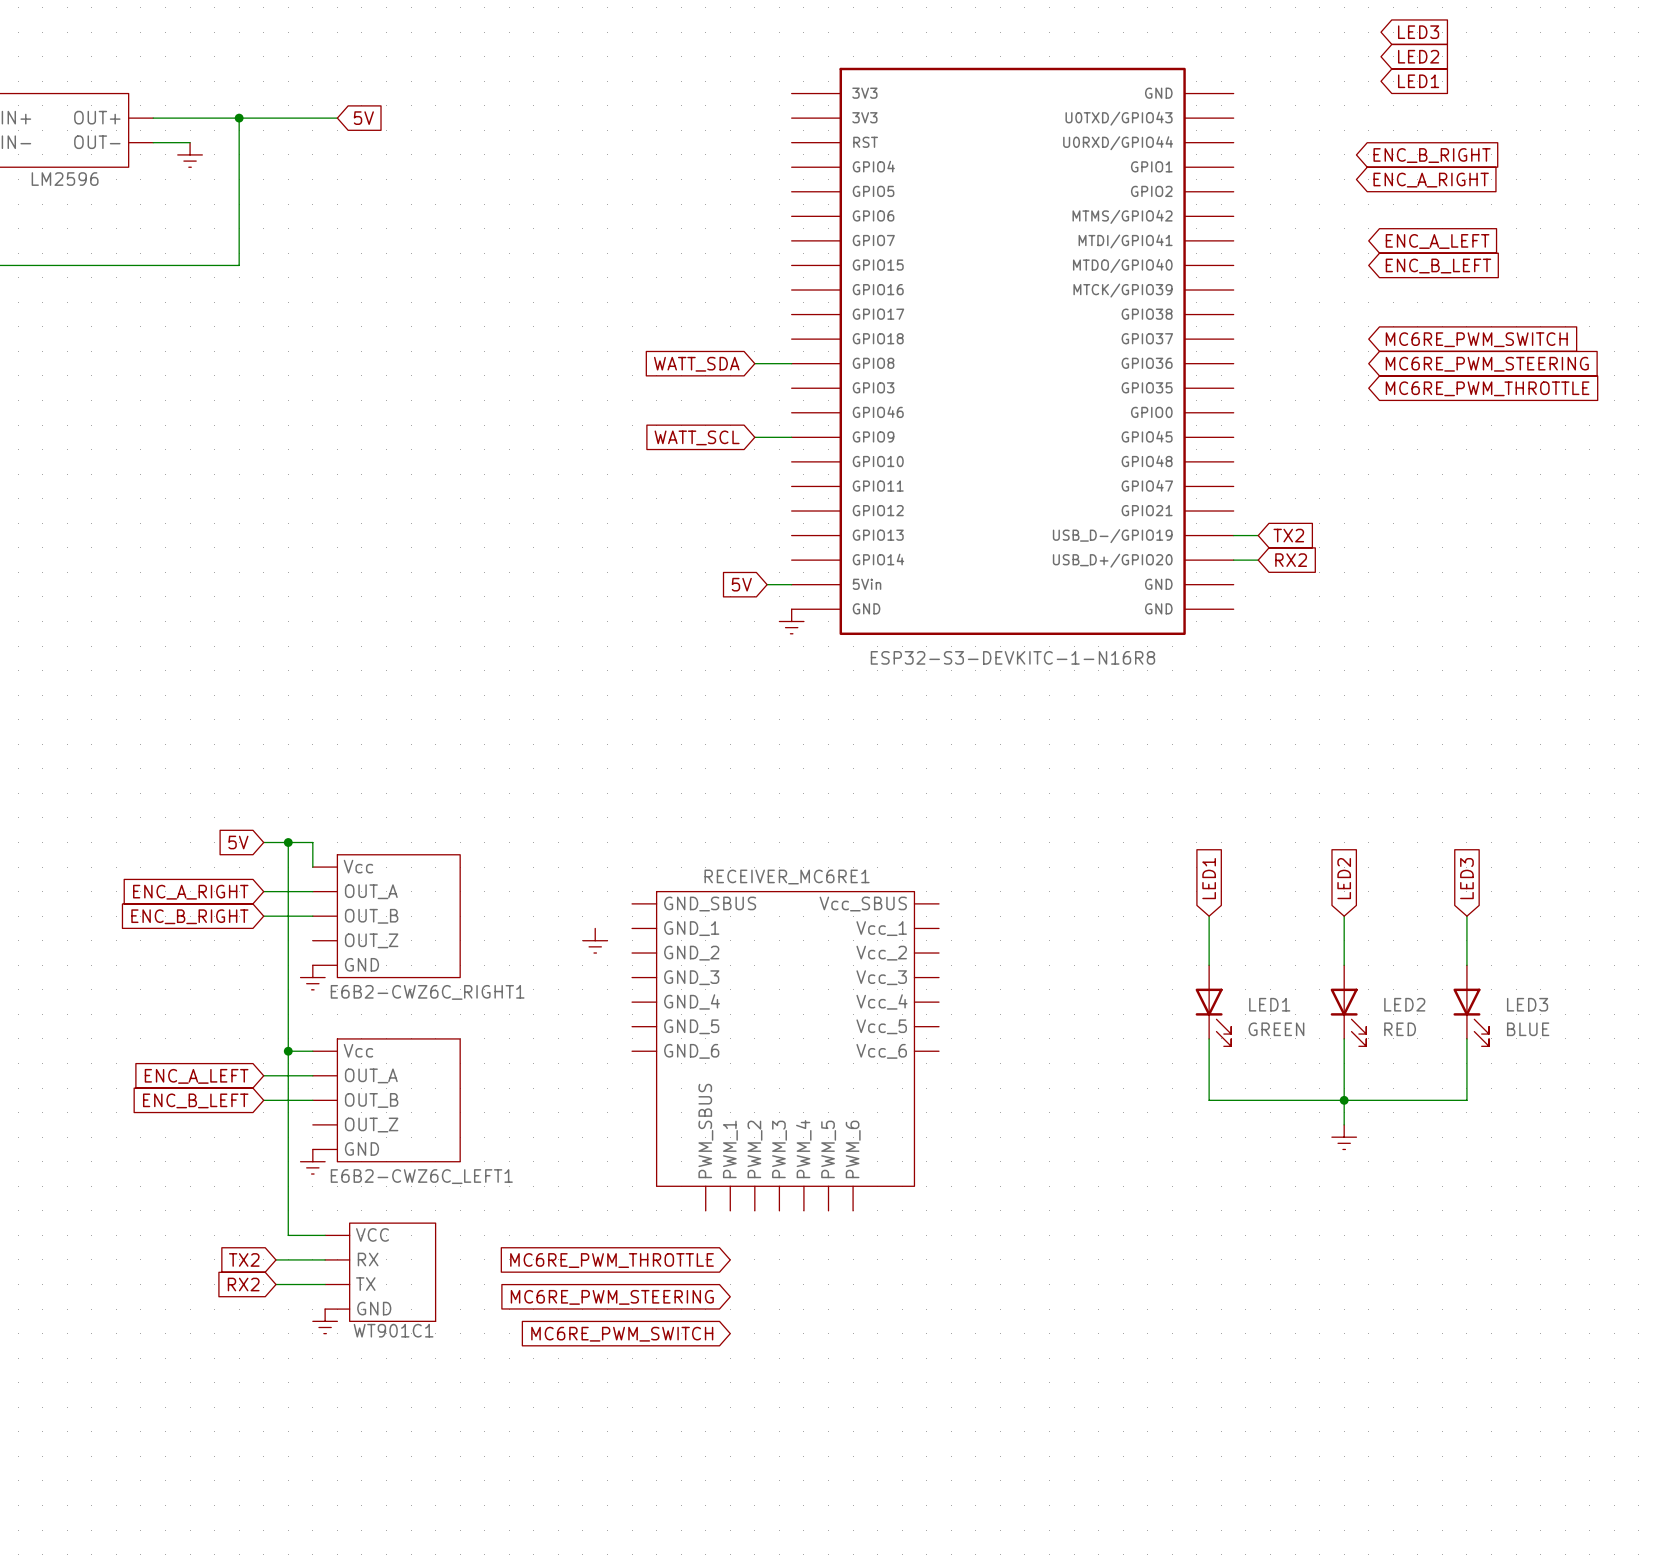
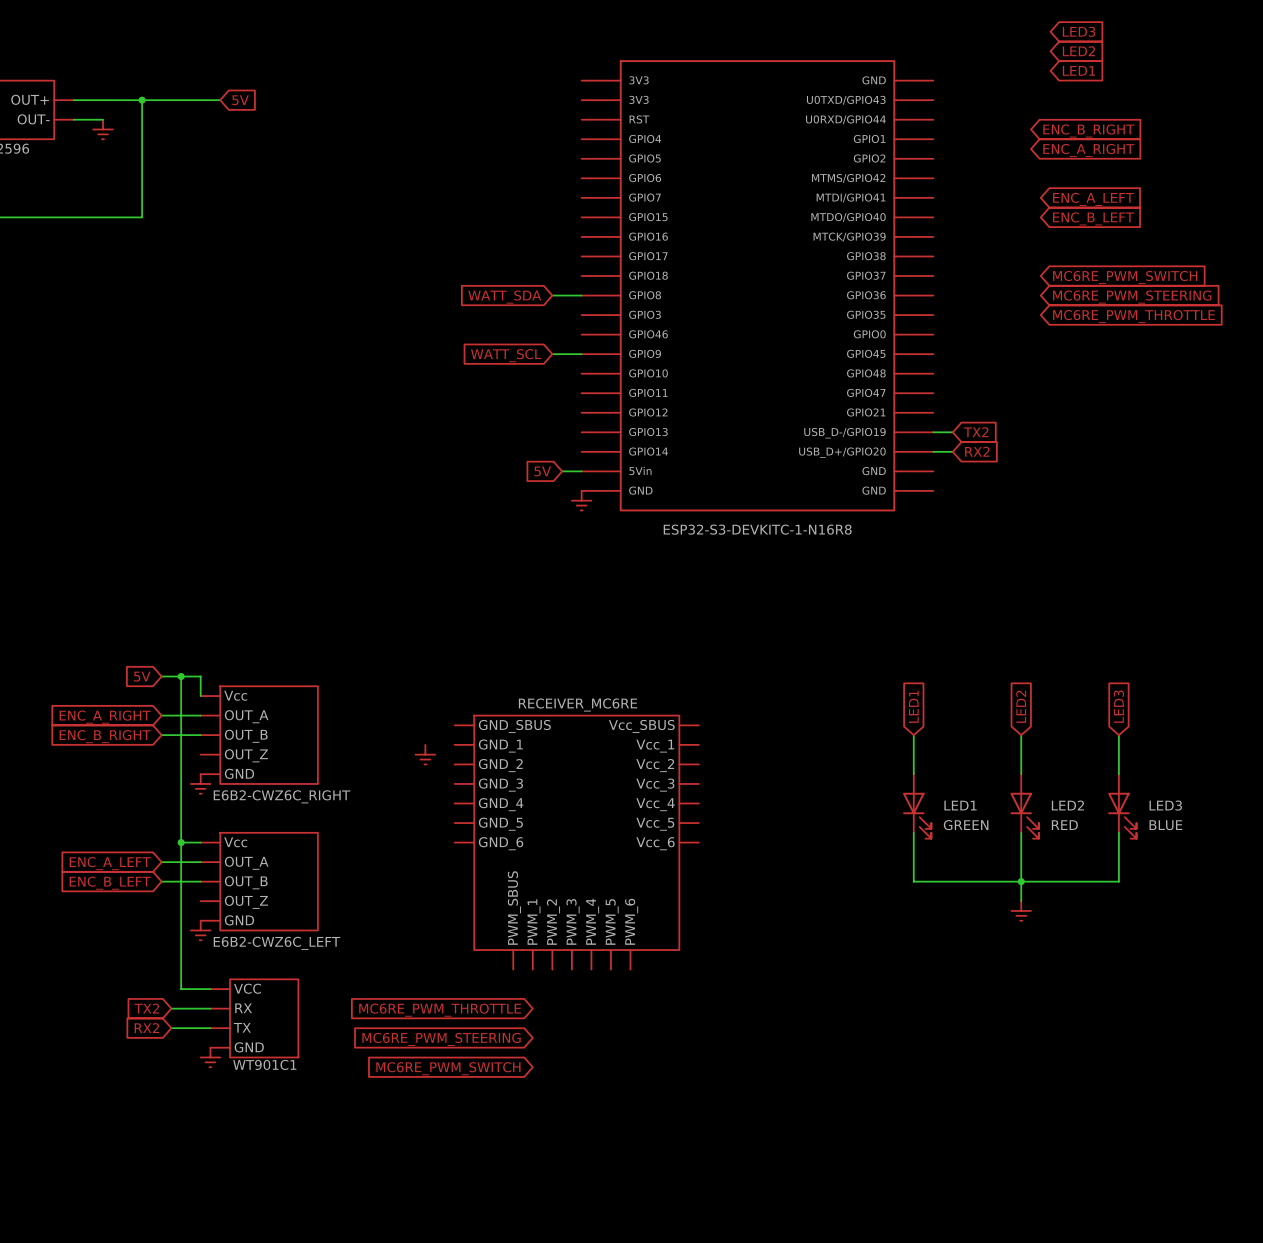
RECEIVER_MC6RE1 name: RECEIVER_MC6RE1 (787, 877) -> RECEIVER_MC6RE (577, 704)
E6B2-CWZ6C_RIGHT1 name: E6B2-CWZ6C_RIGHT1 (427, 992) -> E6B2-CWZ6C_RIGHT (282, 796)
E6B2-CWZ6C_LEFT1 name: E6B2-CWZ6C_LEFT1 (421, 1176) -> E6B2-CWZ6C_LEFT (276, 943)

